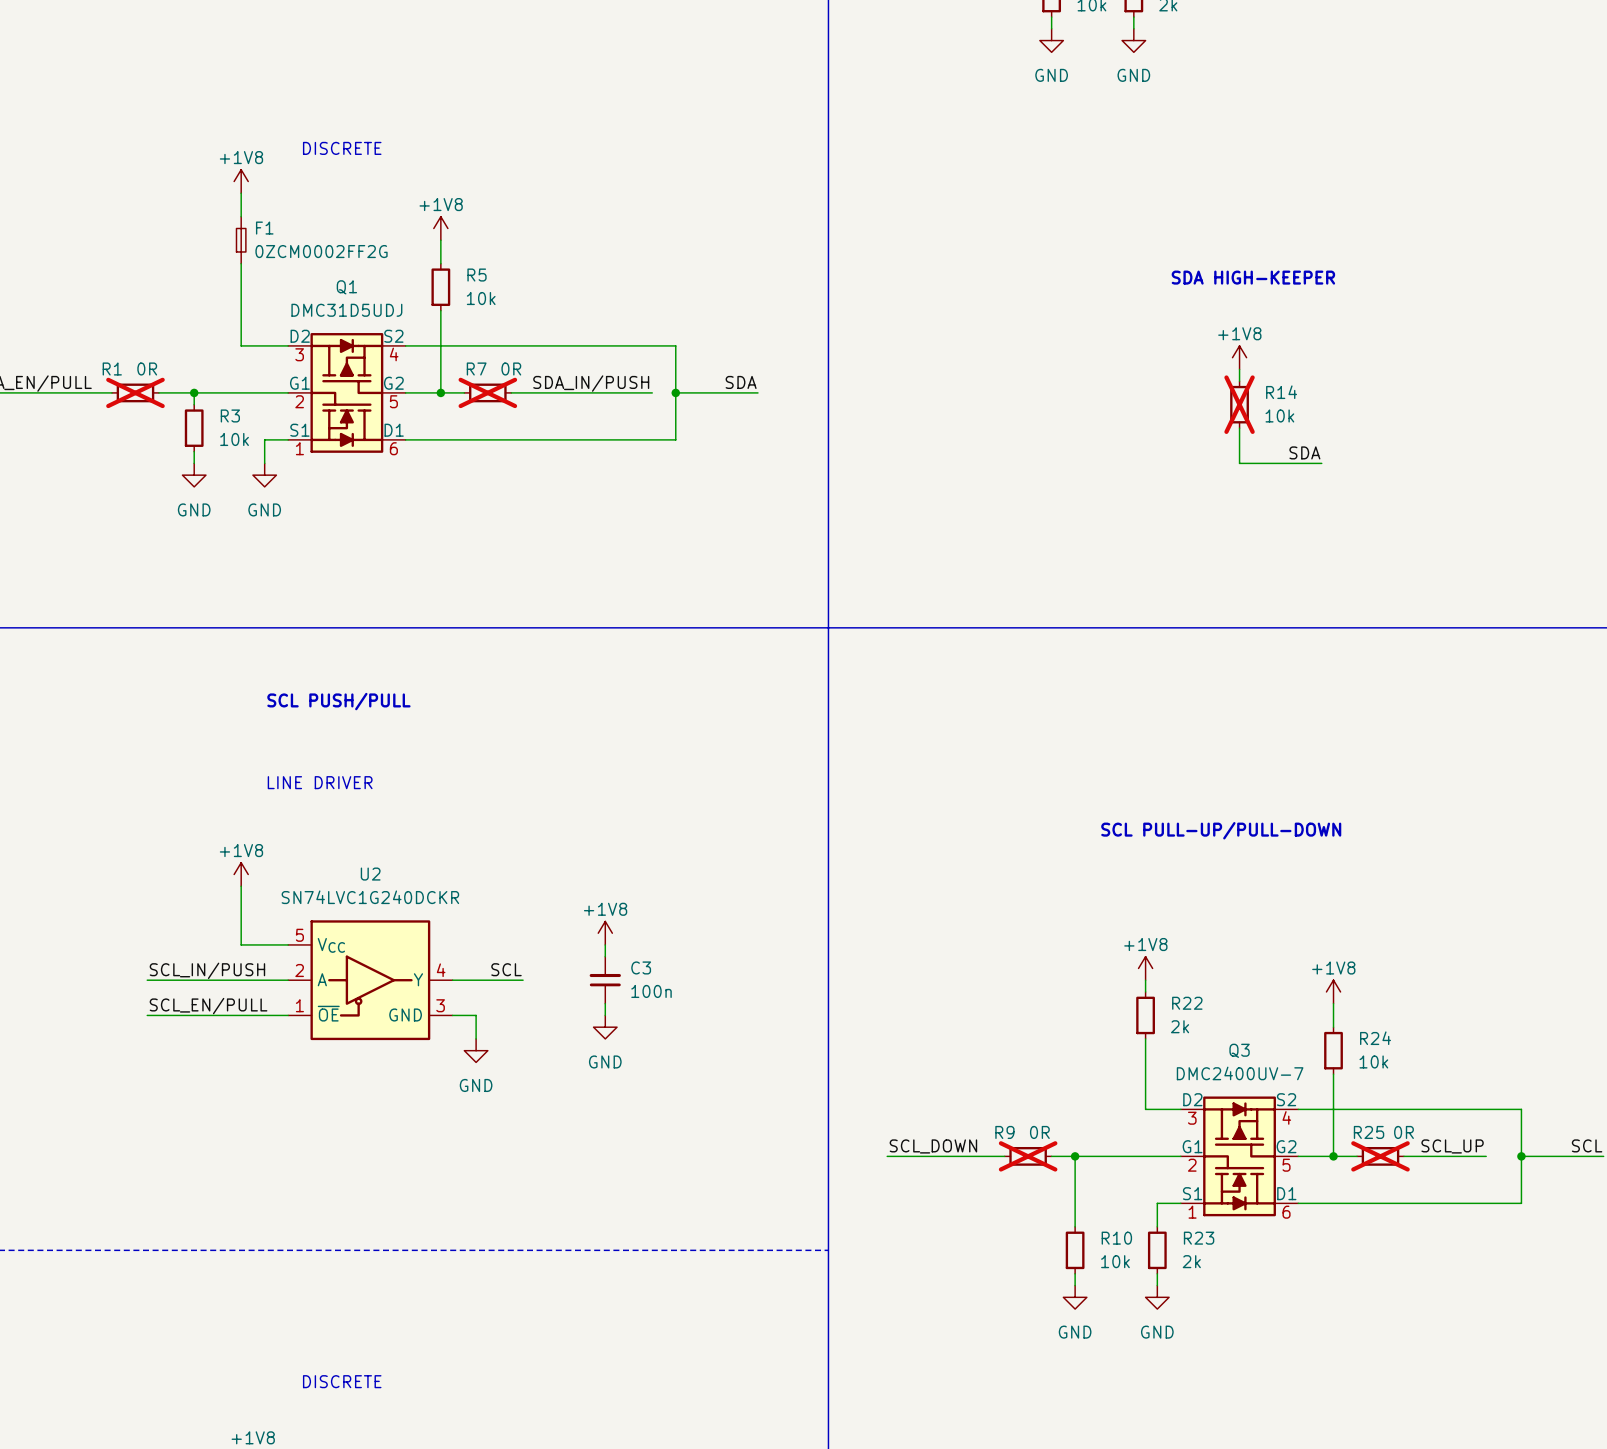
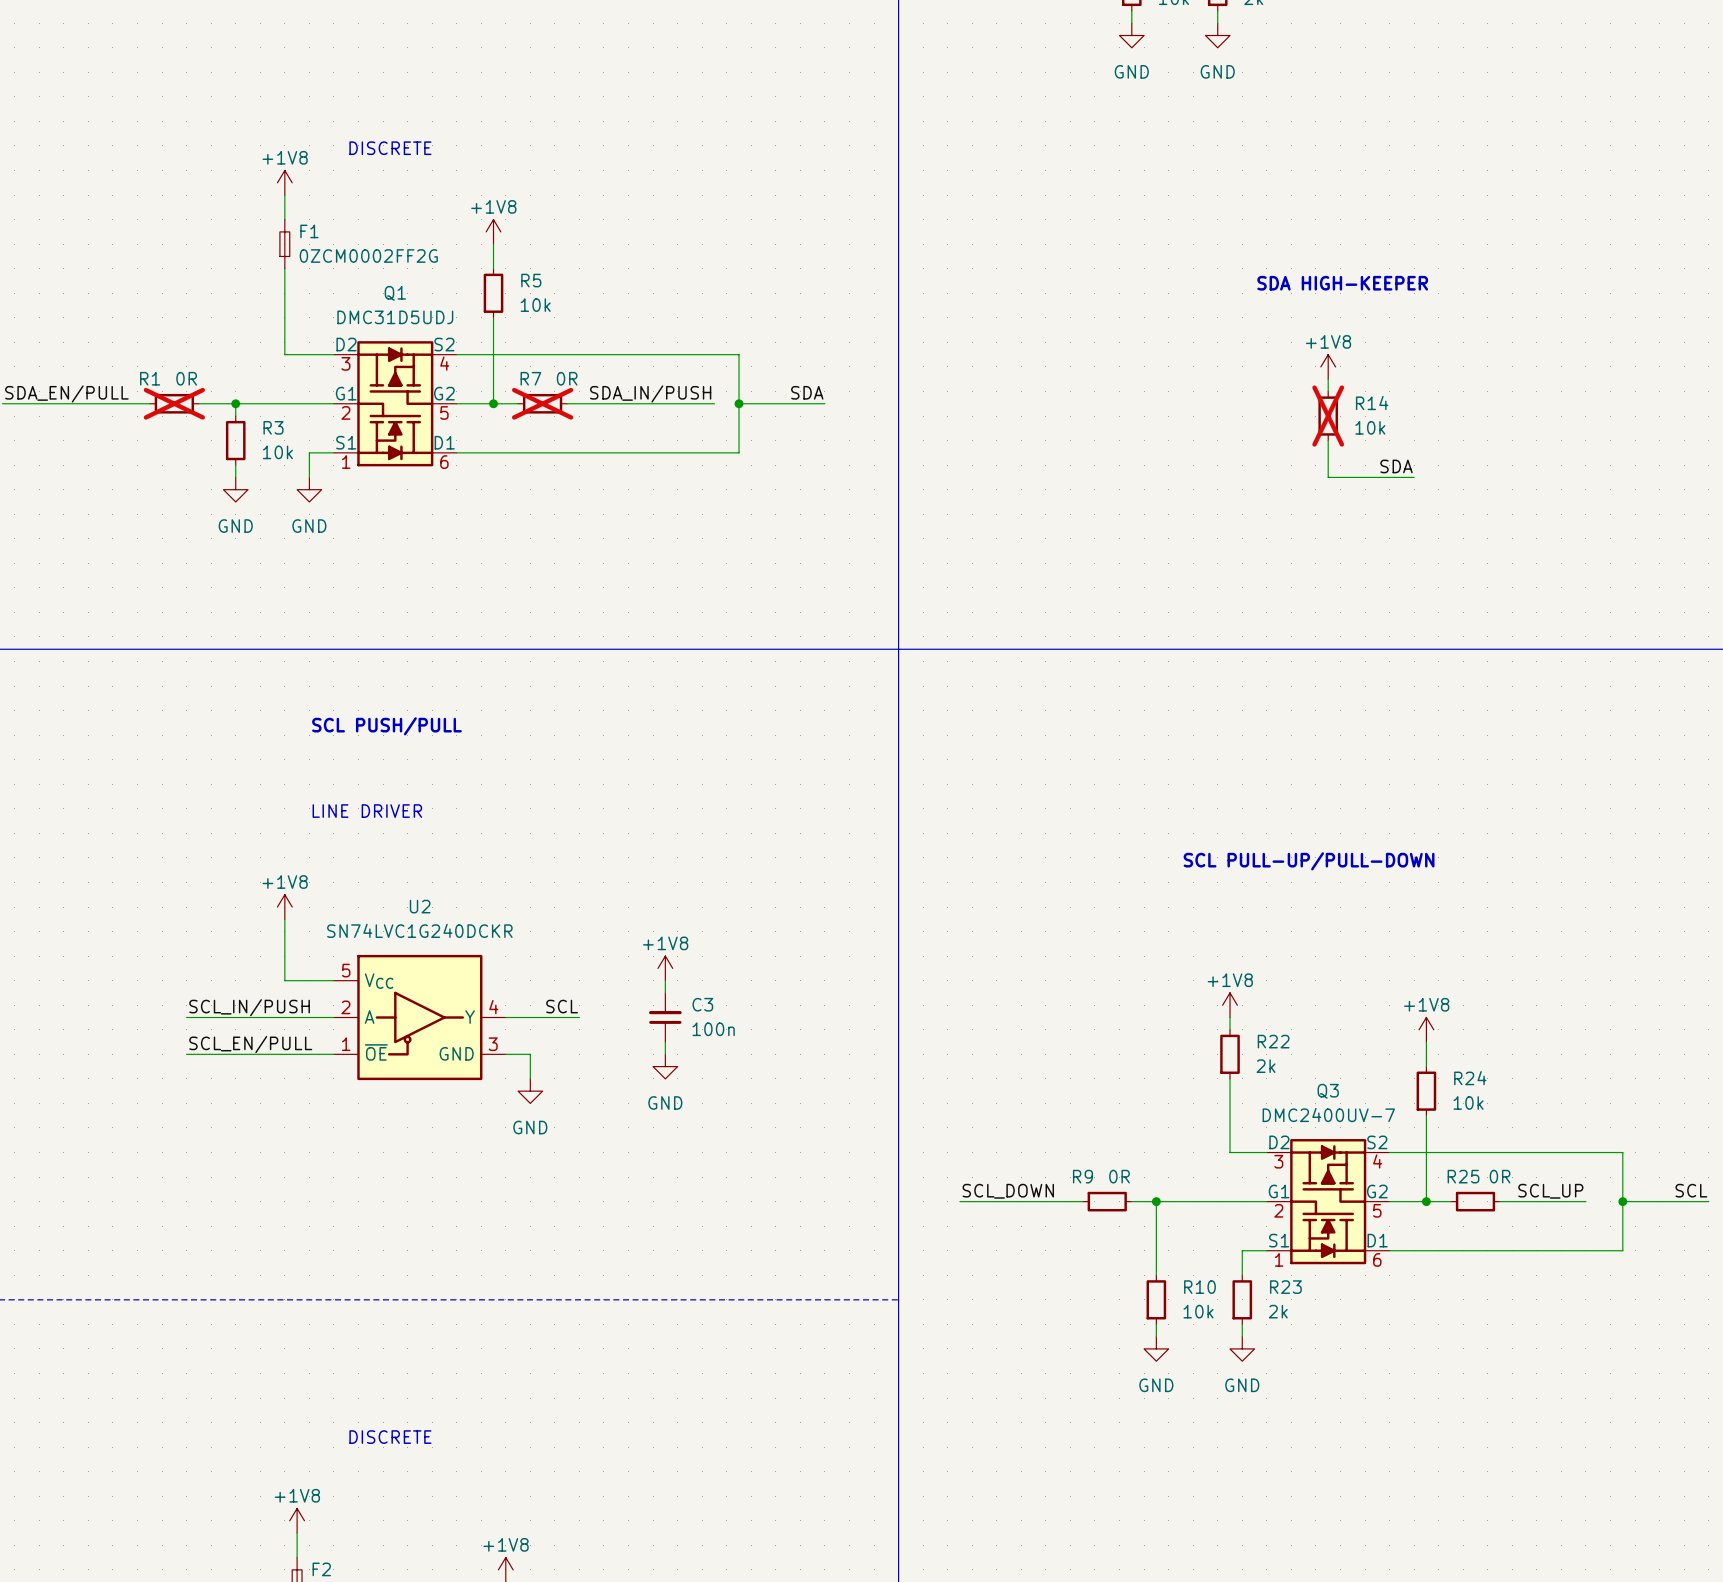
R9 do-not-place cross: (1028, 1156) -> none
R25 do-not-place cross: (1380, 1156) -> none

